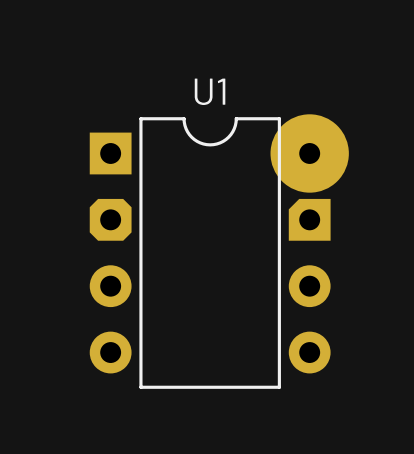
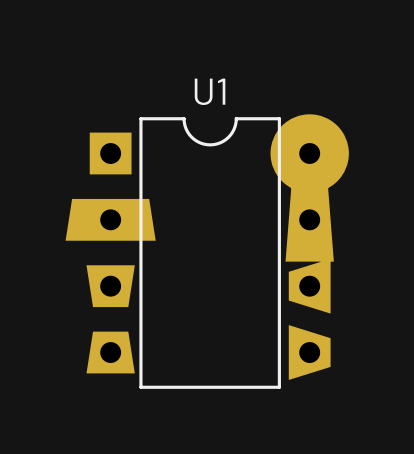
U1 footprint: [89, 114, 349, 389] -> [65, 114, 349, 389]

